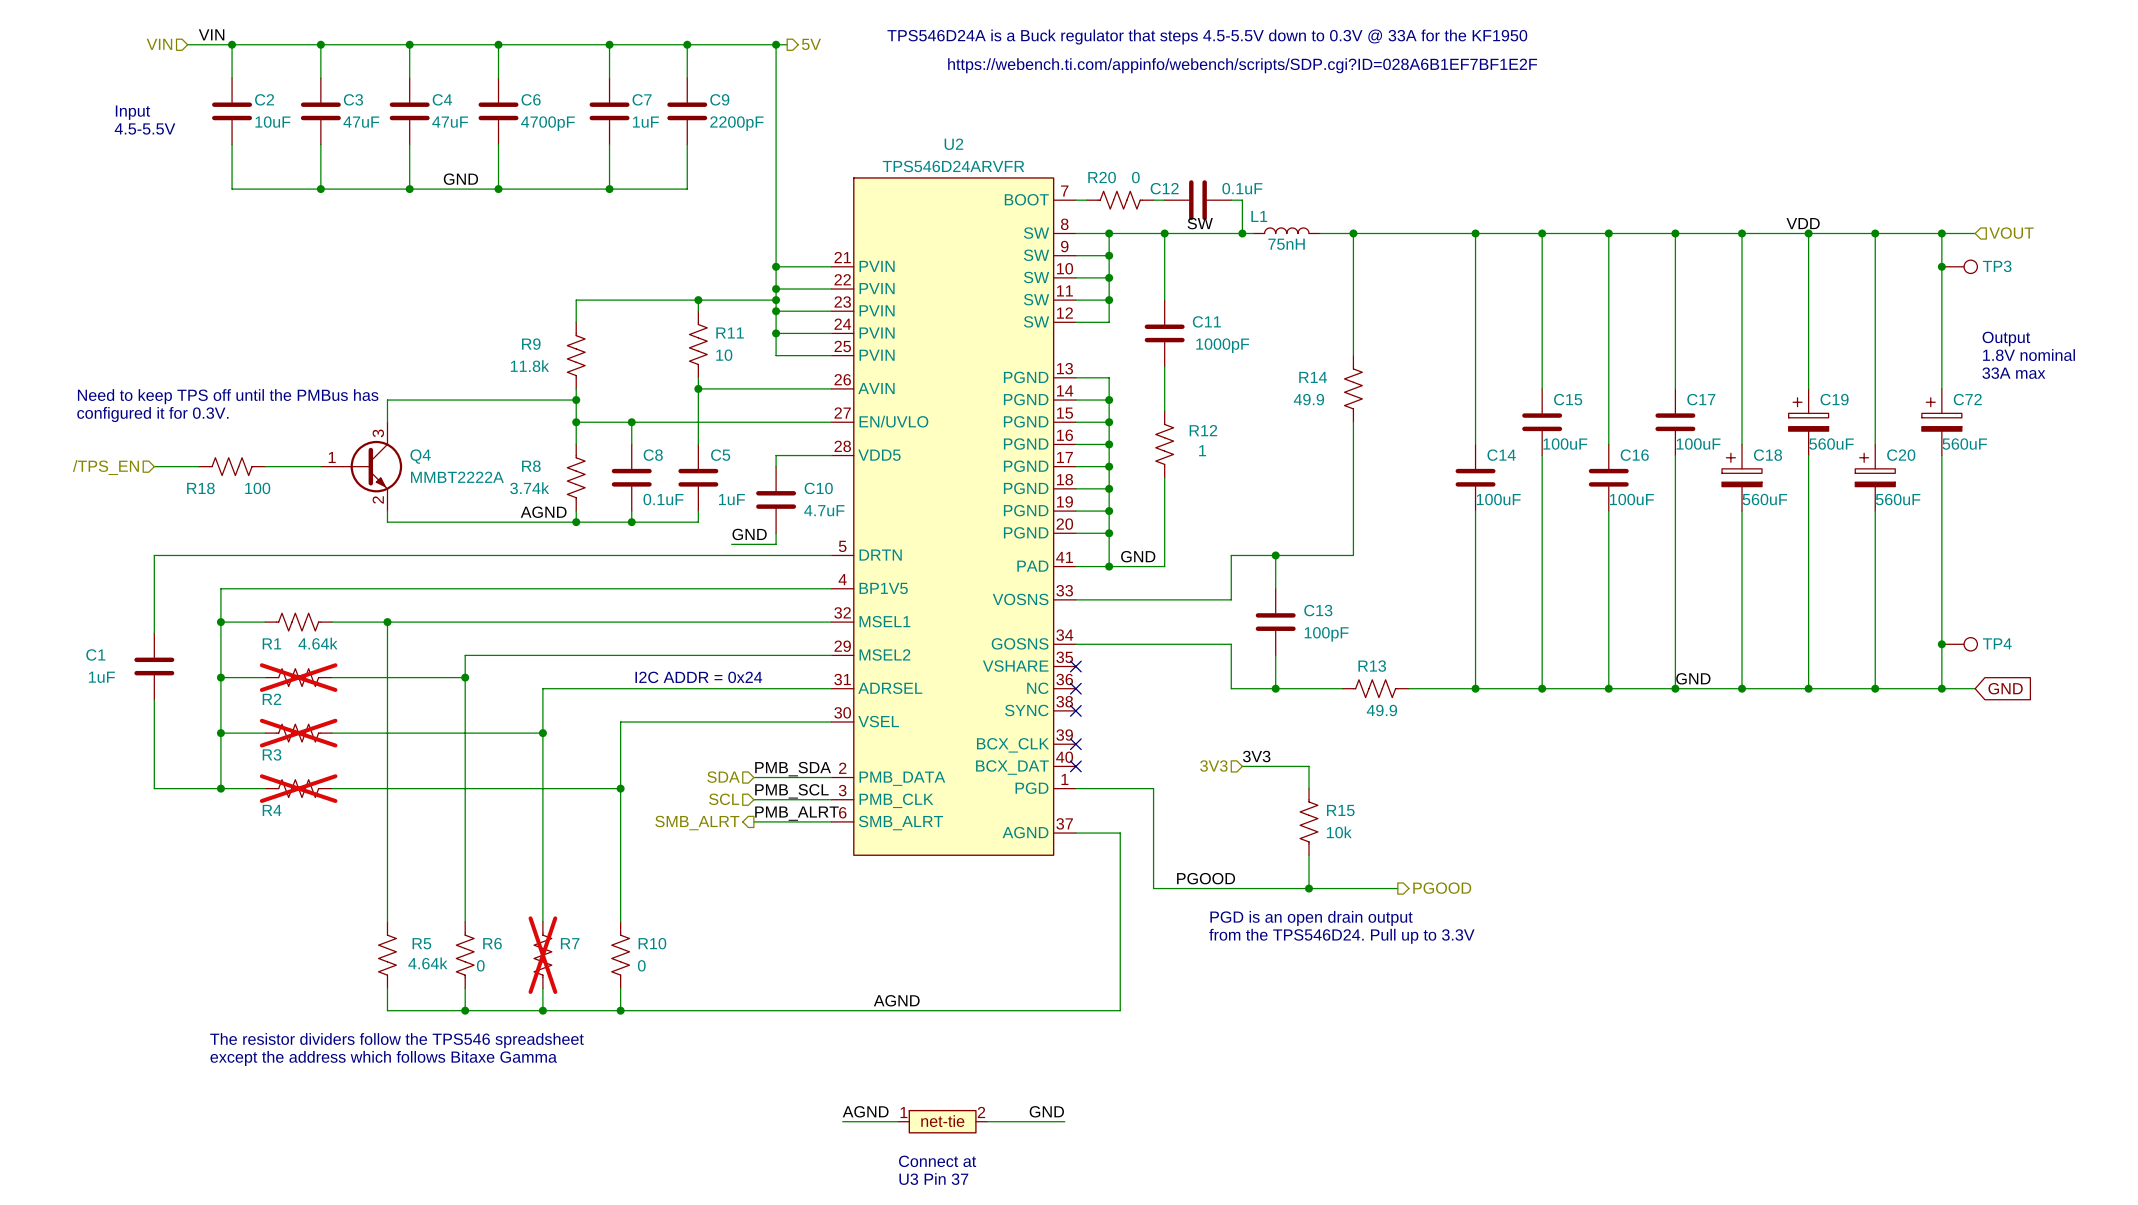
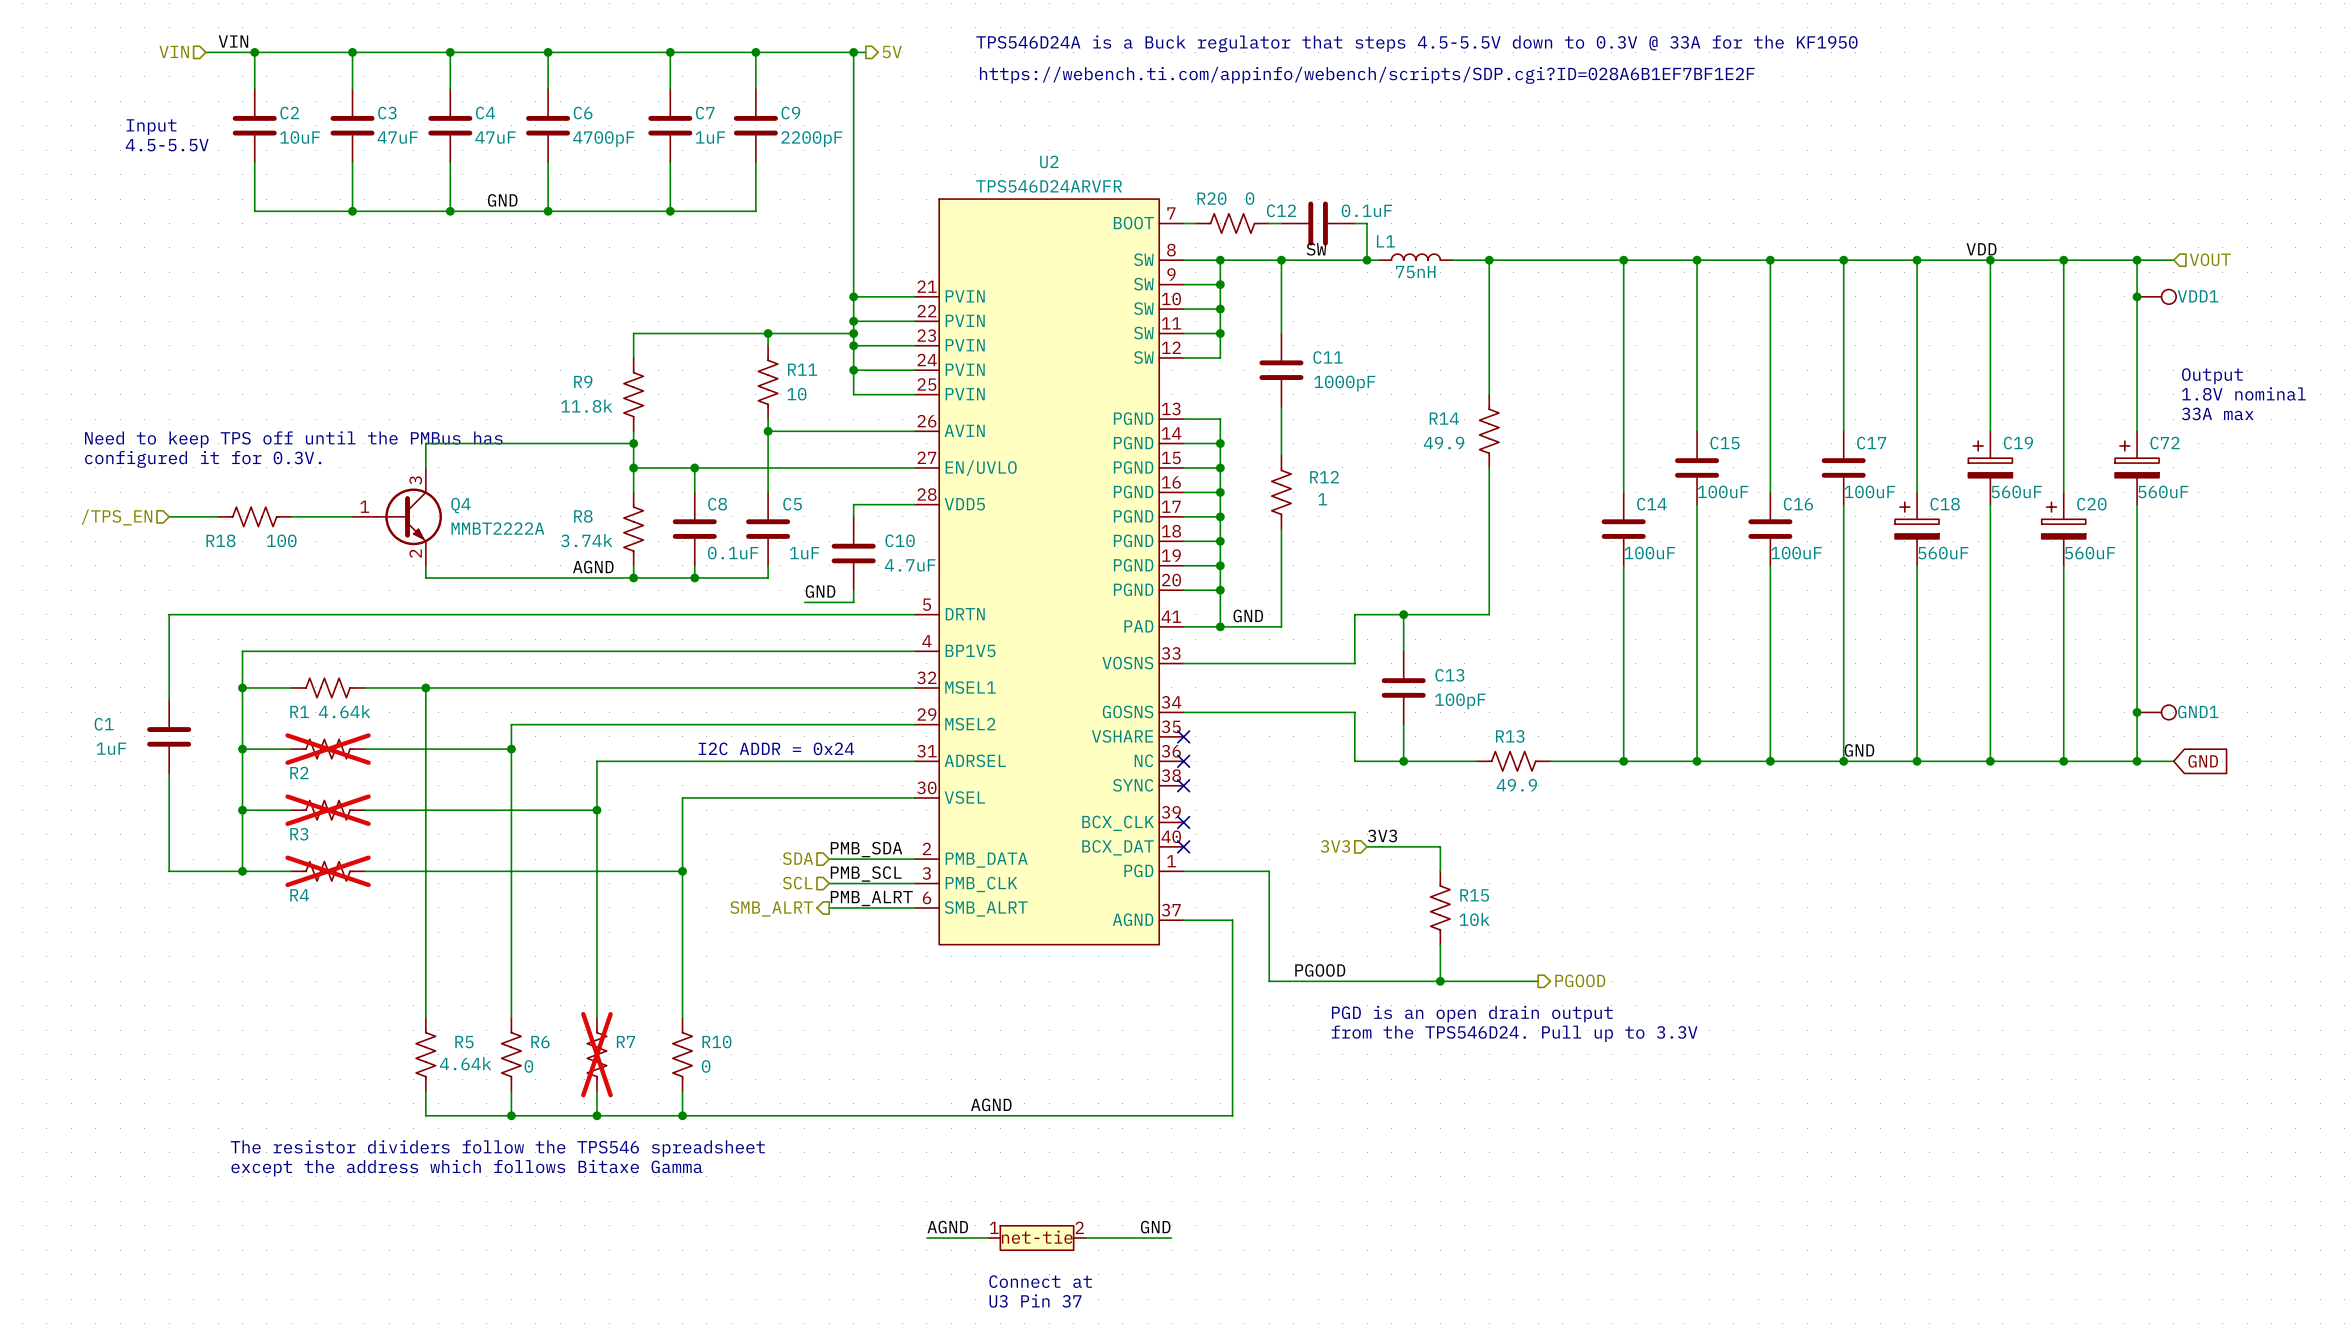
TP3 name: TP3 (1997, 266) -> VDD1 (2198, 296)
TP4 name: TP4 (1997, 643) -> GND1 (2198, 711)

